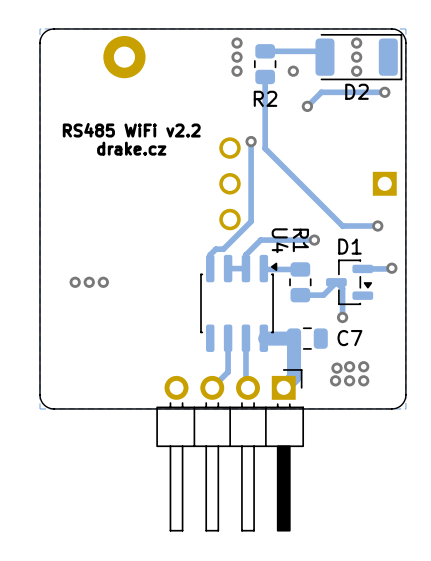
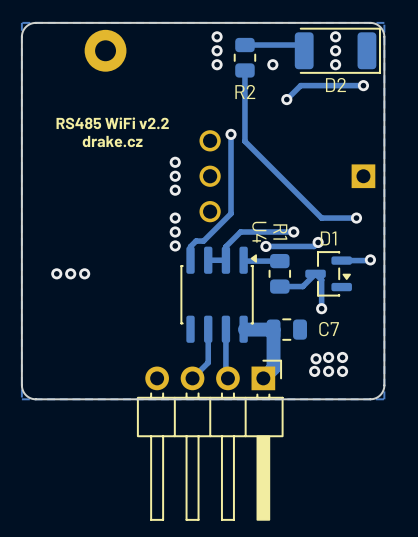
via: none -> (175, 162)
via: none -> (175, 176)
via: none -> (175, 190)
via: none -> (175, 218)
via: none -> (175, 232)
track: none -> (318, 242) (314, 246) (265, 246)
via: none -> (318, 242)
via: none -> (175, 245)
via: none -> (265, 246)

